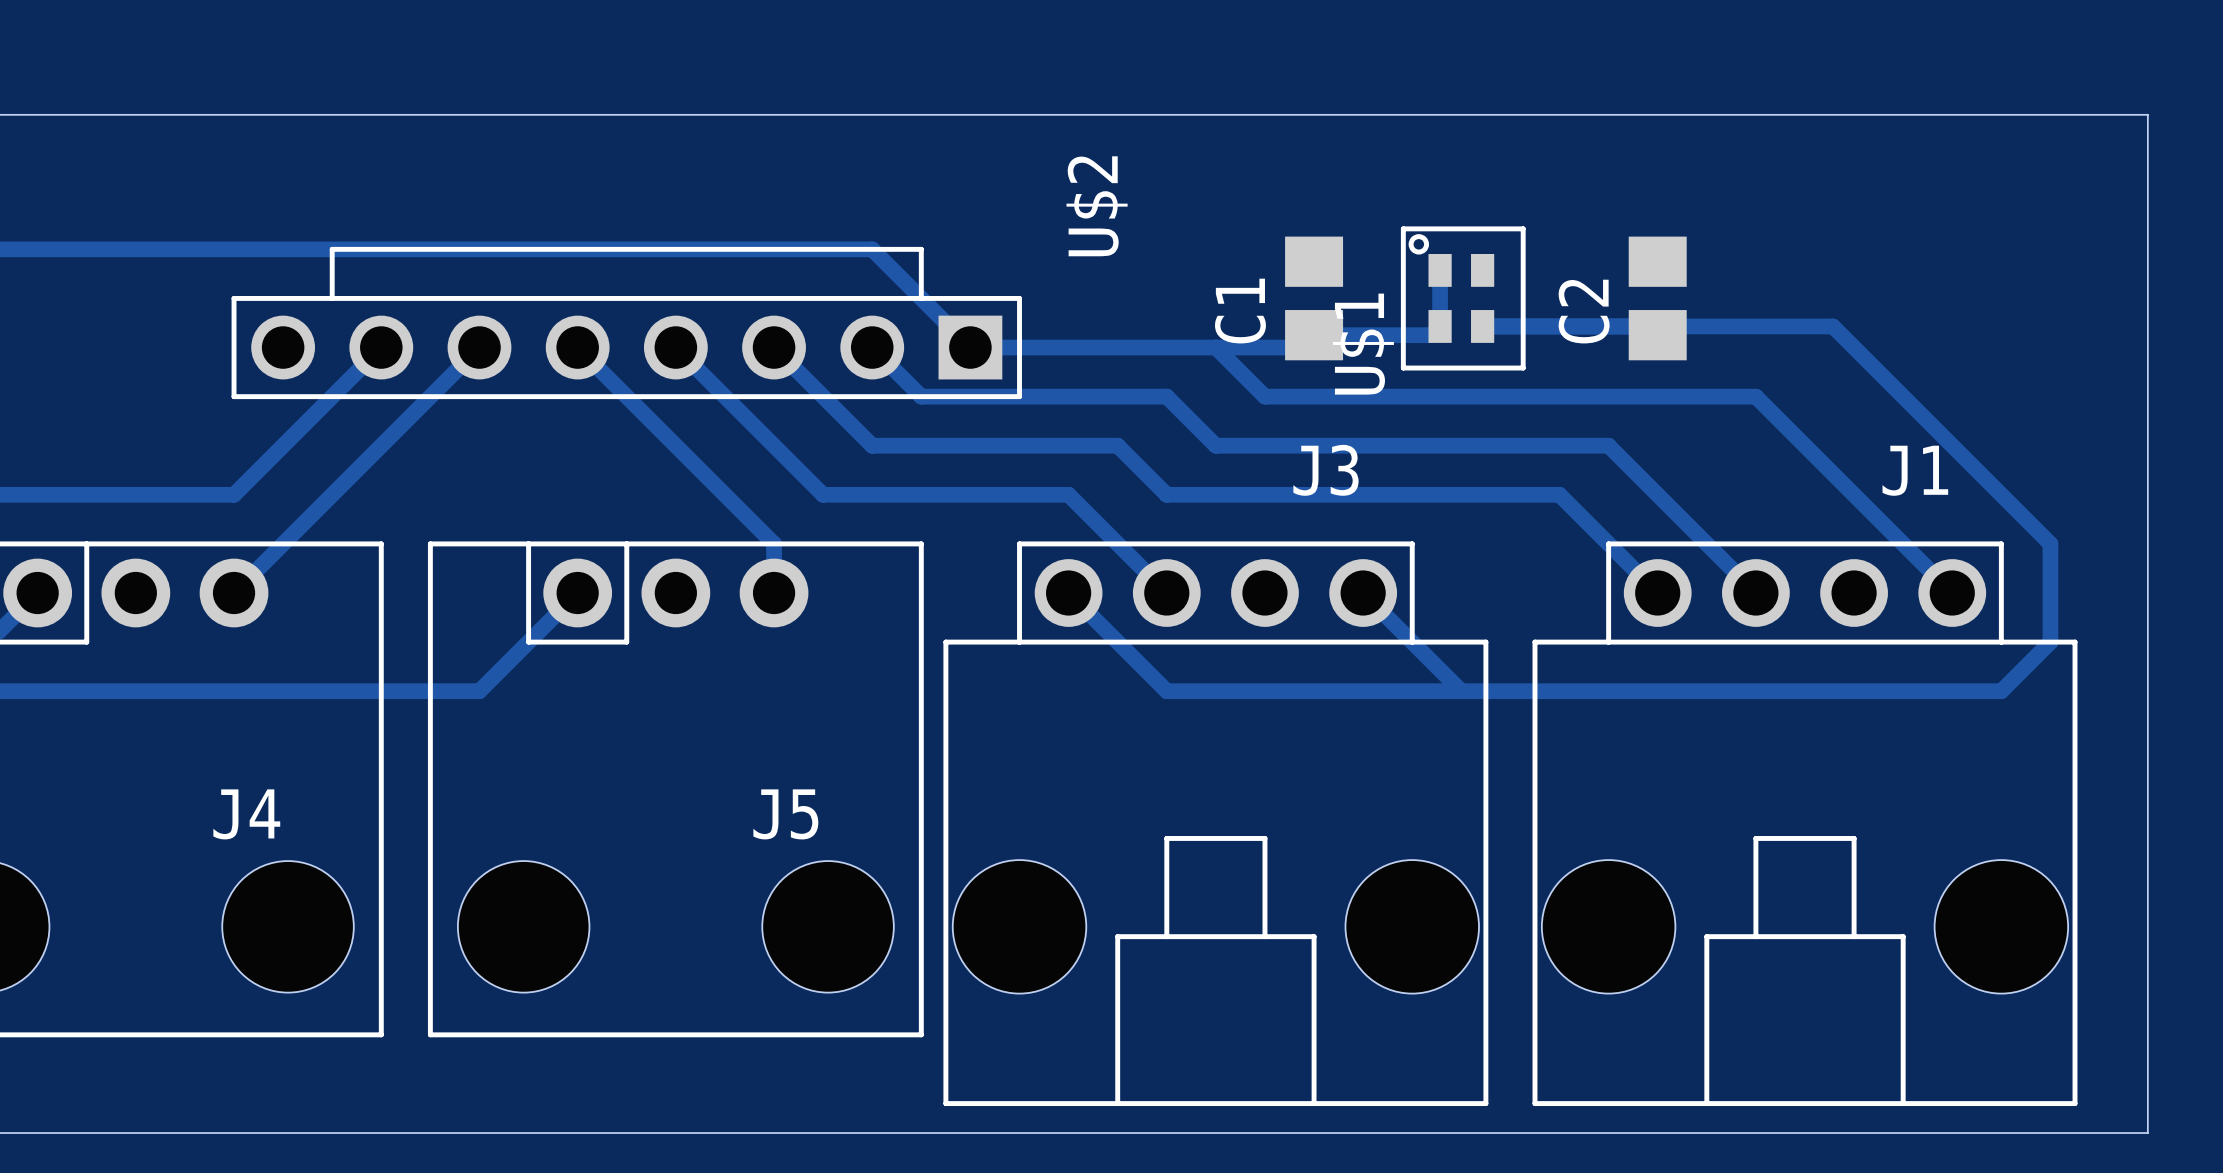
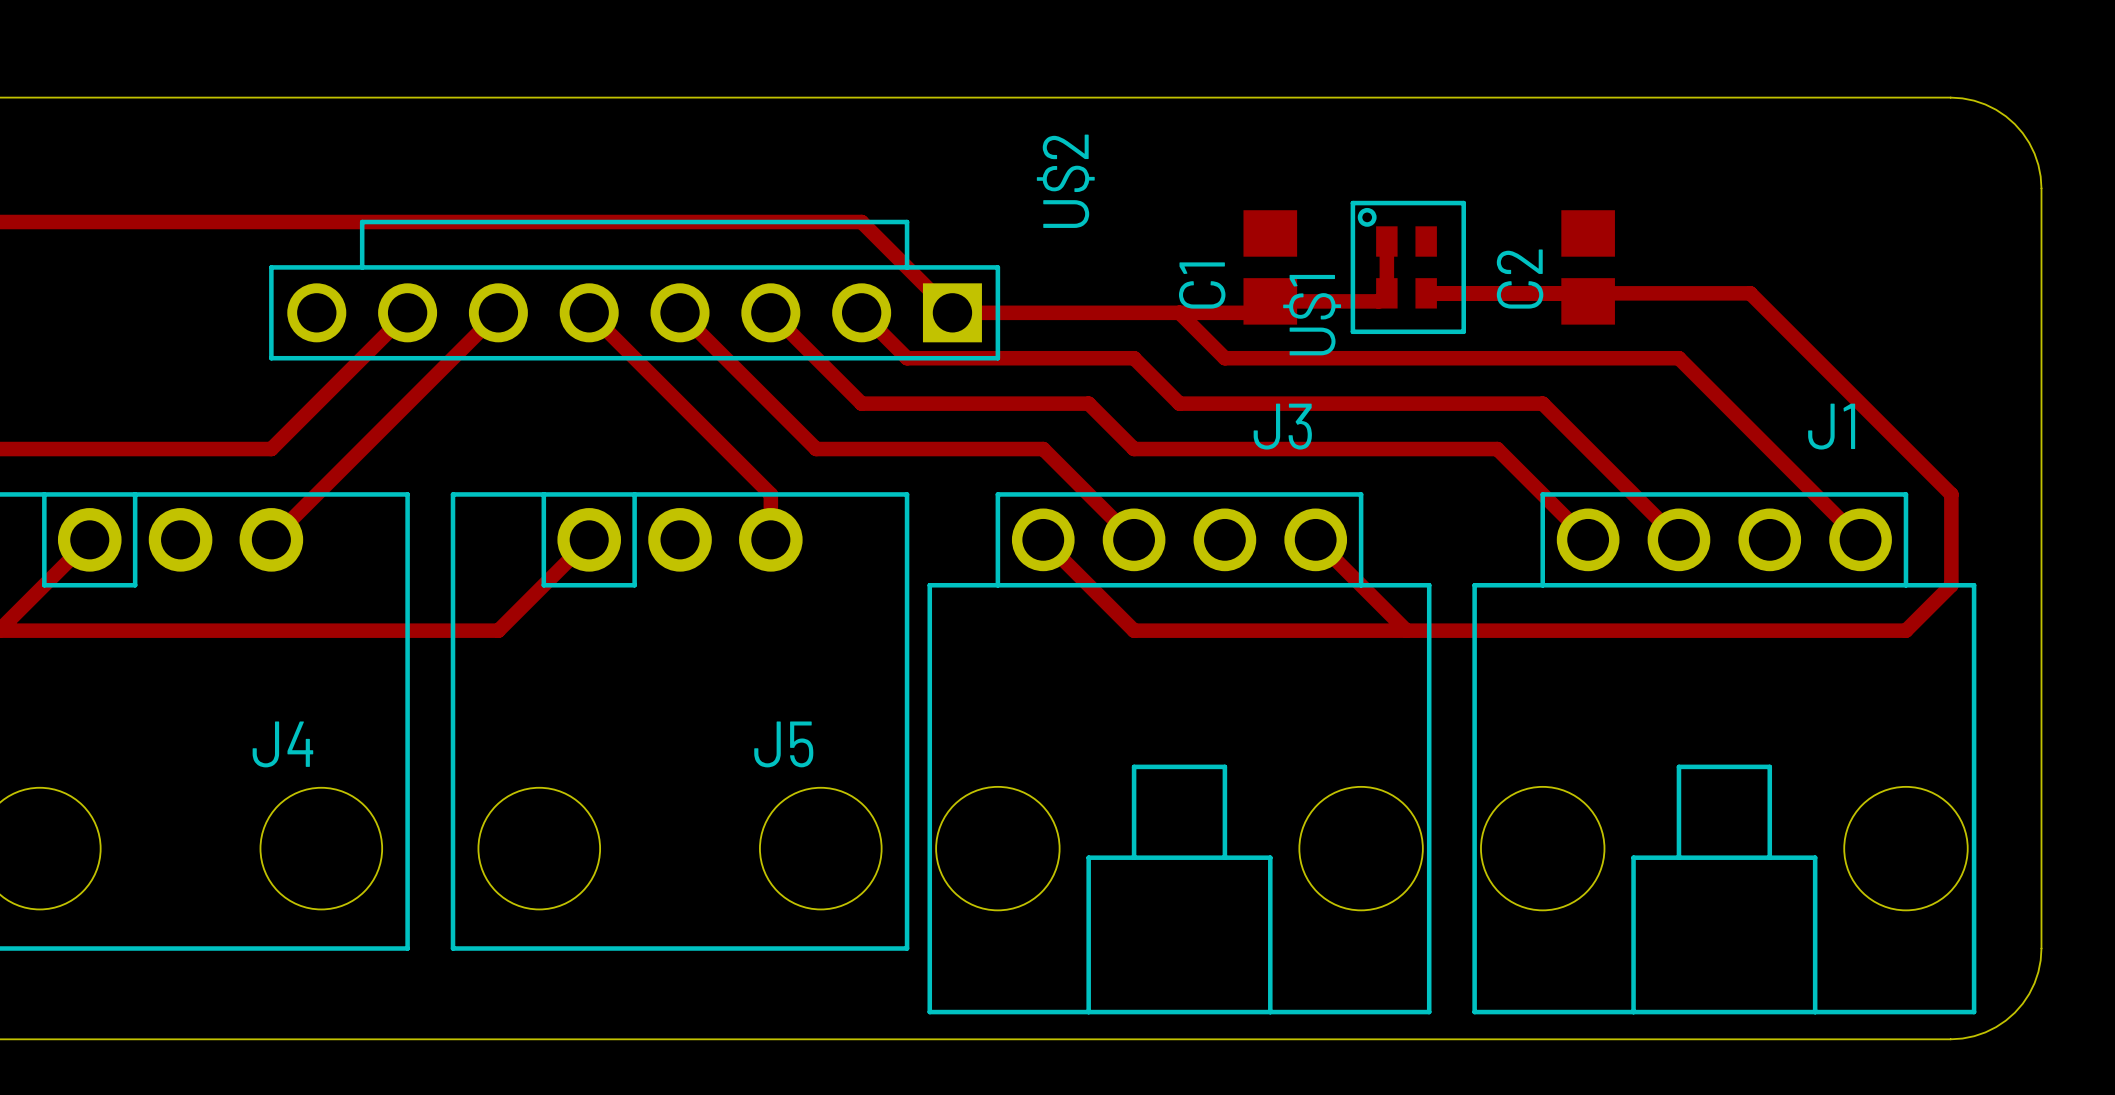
board edge: (2049, 114) (2147, 114) (2147, 213) -> (1950, 97) (1974, 100) (1985, 104) (2005, 116) (2014, 124) (2022, 133) (2034, 153) (2038, 164) (2041, 188)
board edge: (2147, 1034) (2147, 1133) (2049, 1133) -> (2041, 948) (2038, 972) (2034, 983) (2022, 1003) (2014, 1012) (2005, 1020) (1985, 1032) (1974, 1036) (1950, 1039)

